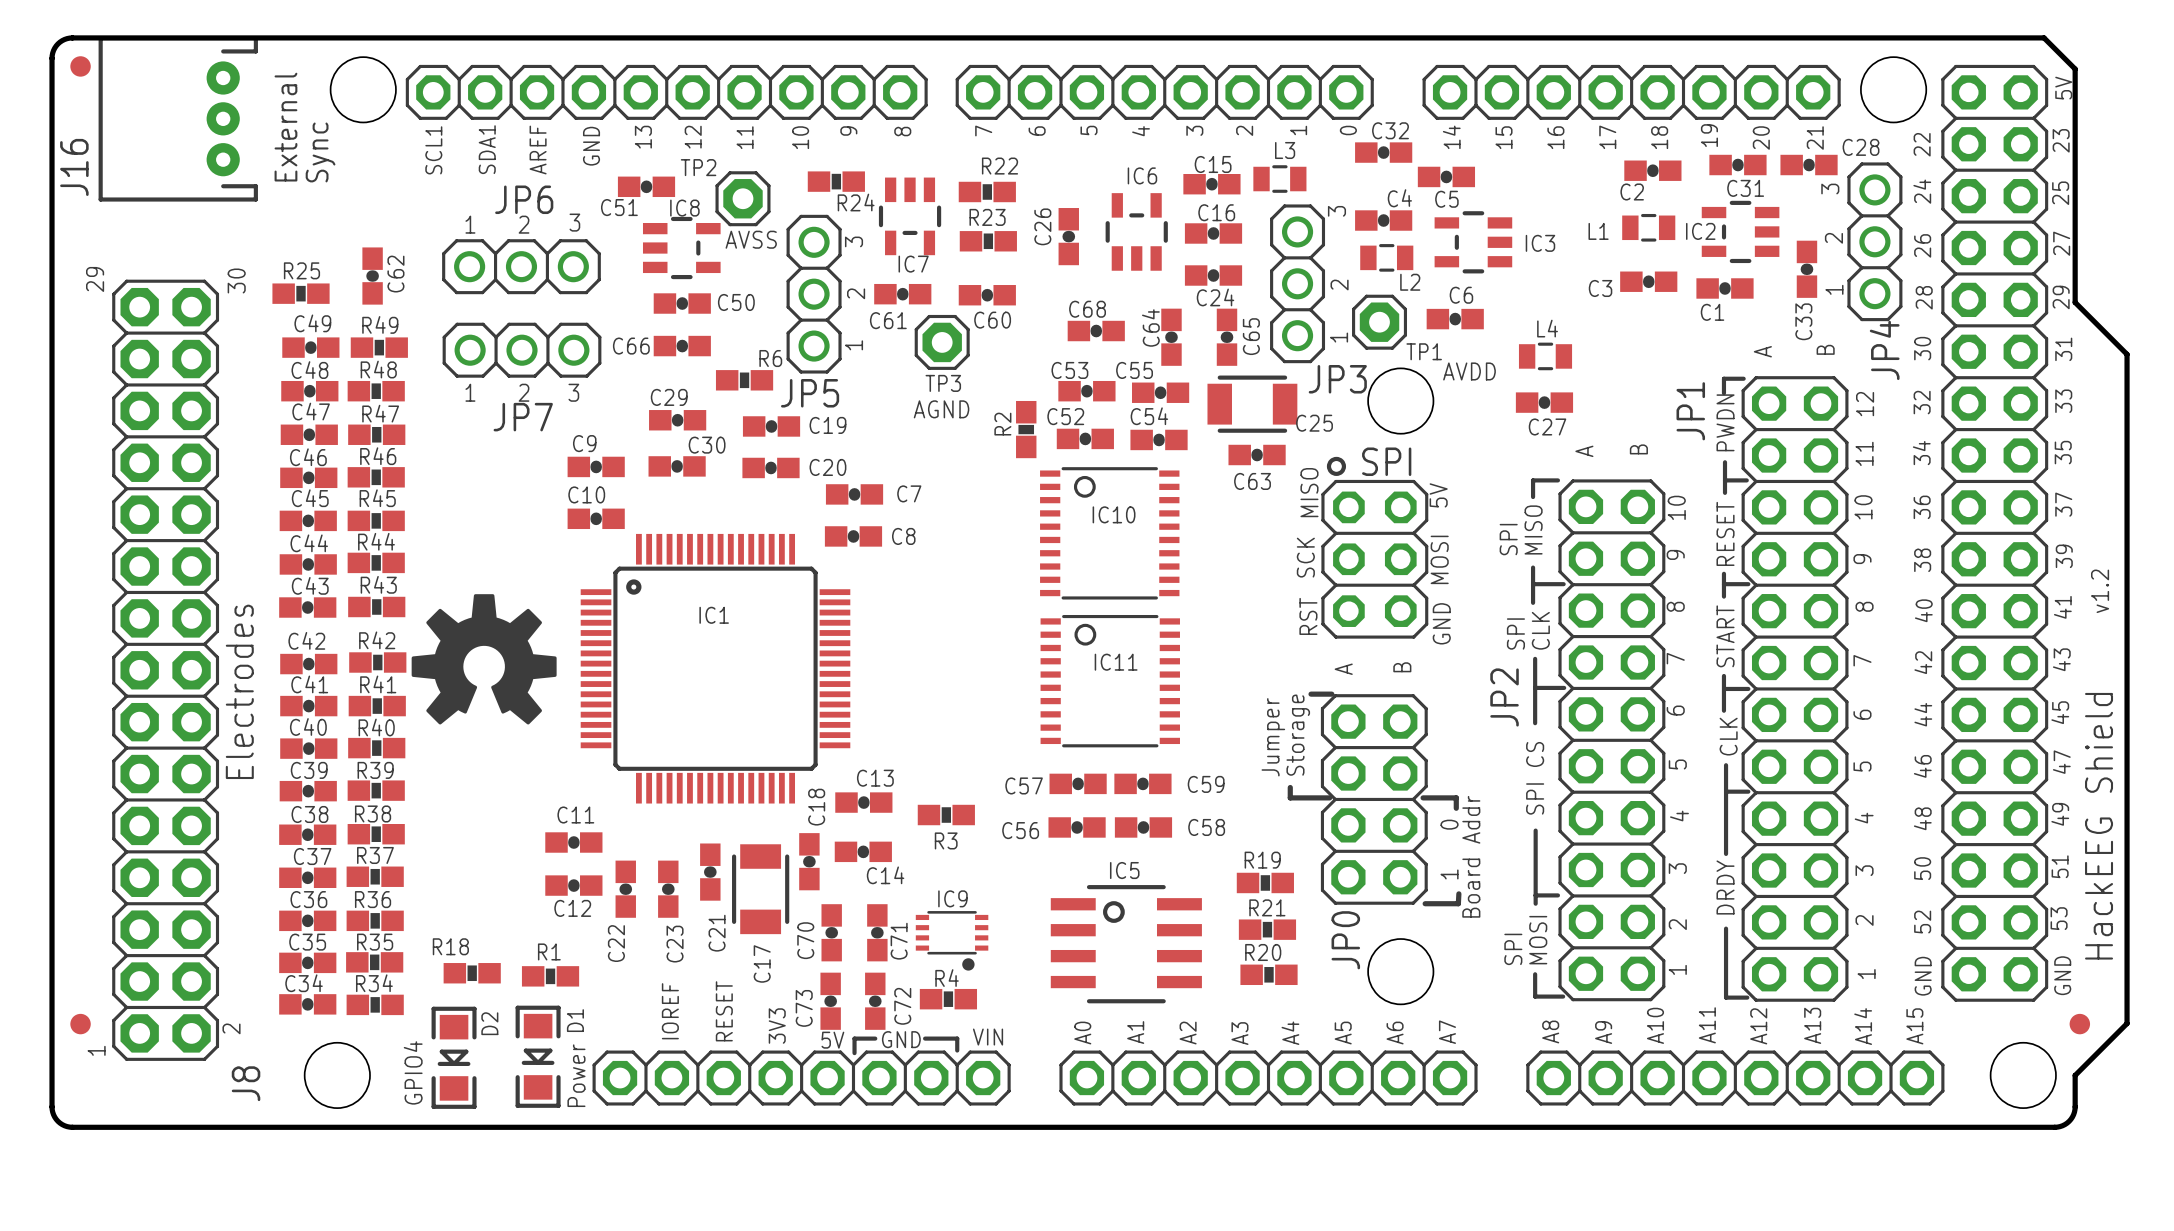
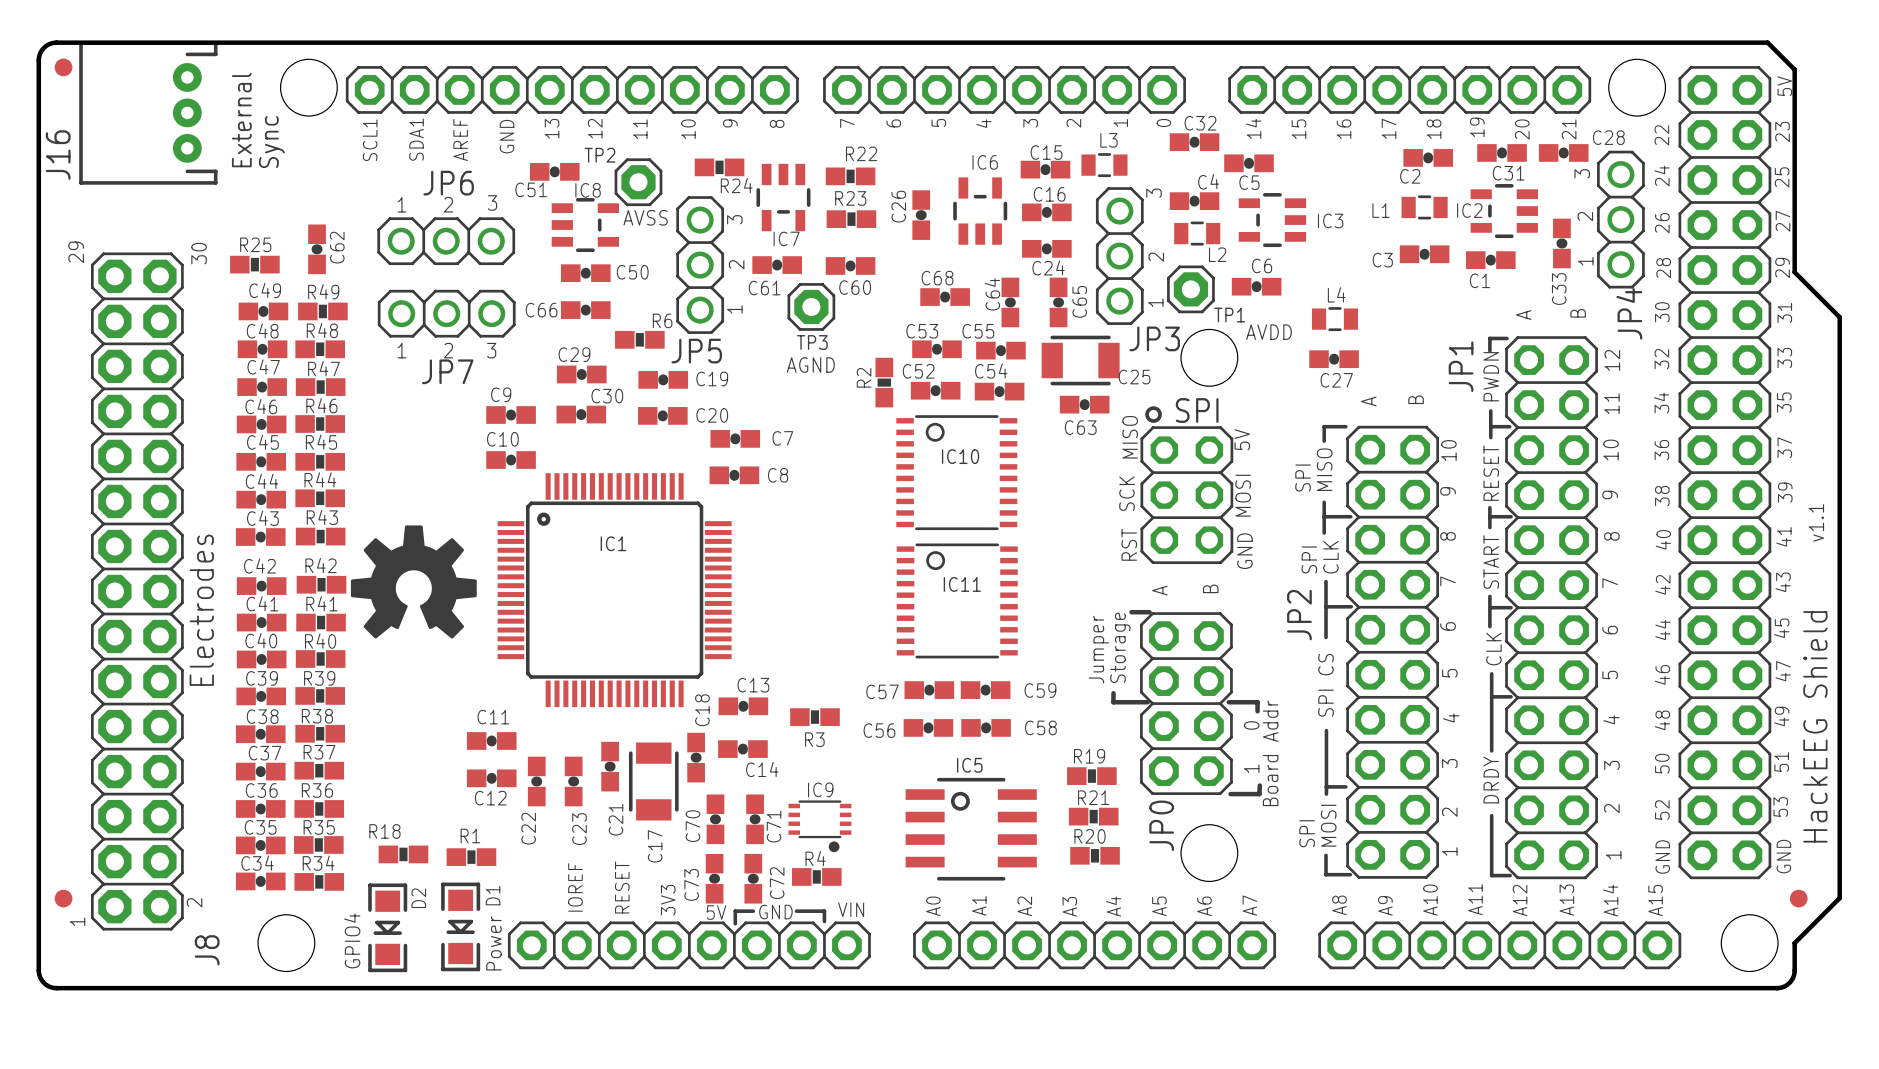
text: v1.2 (2100, 591) -> v1.1 (1816, 522)

